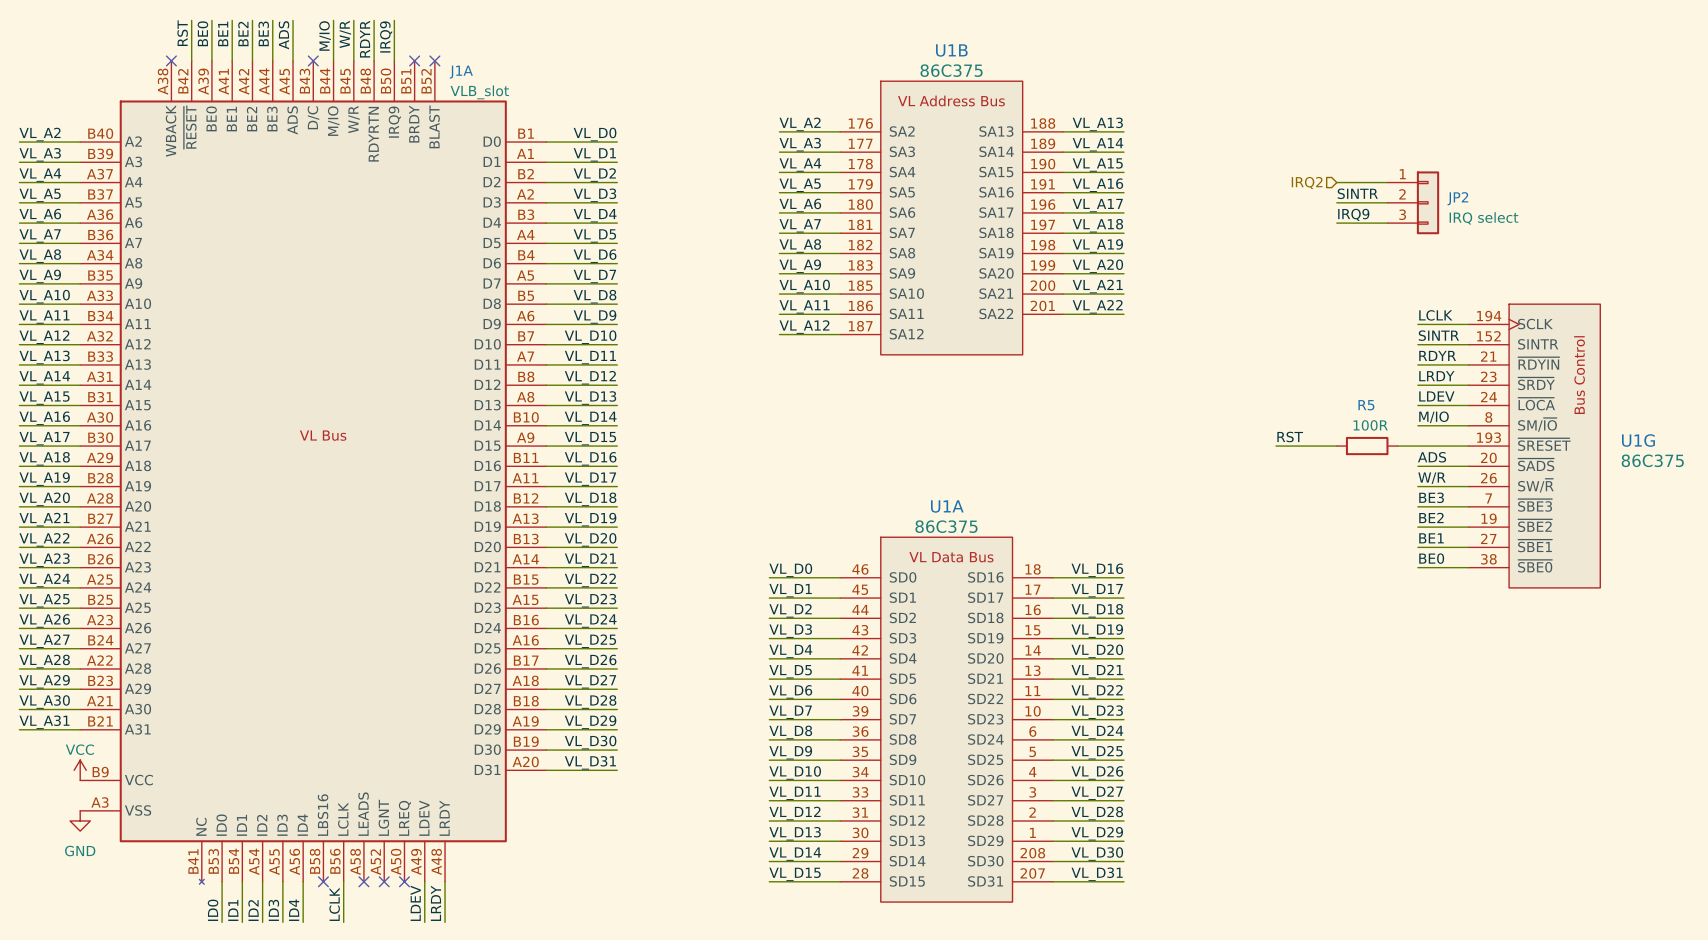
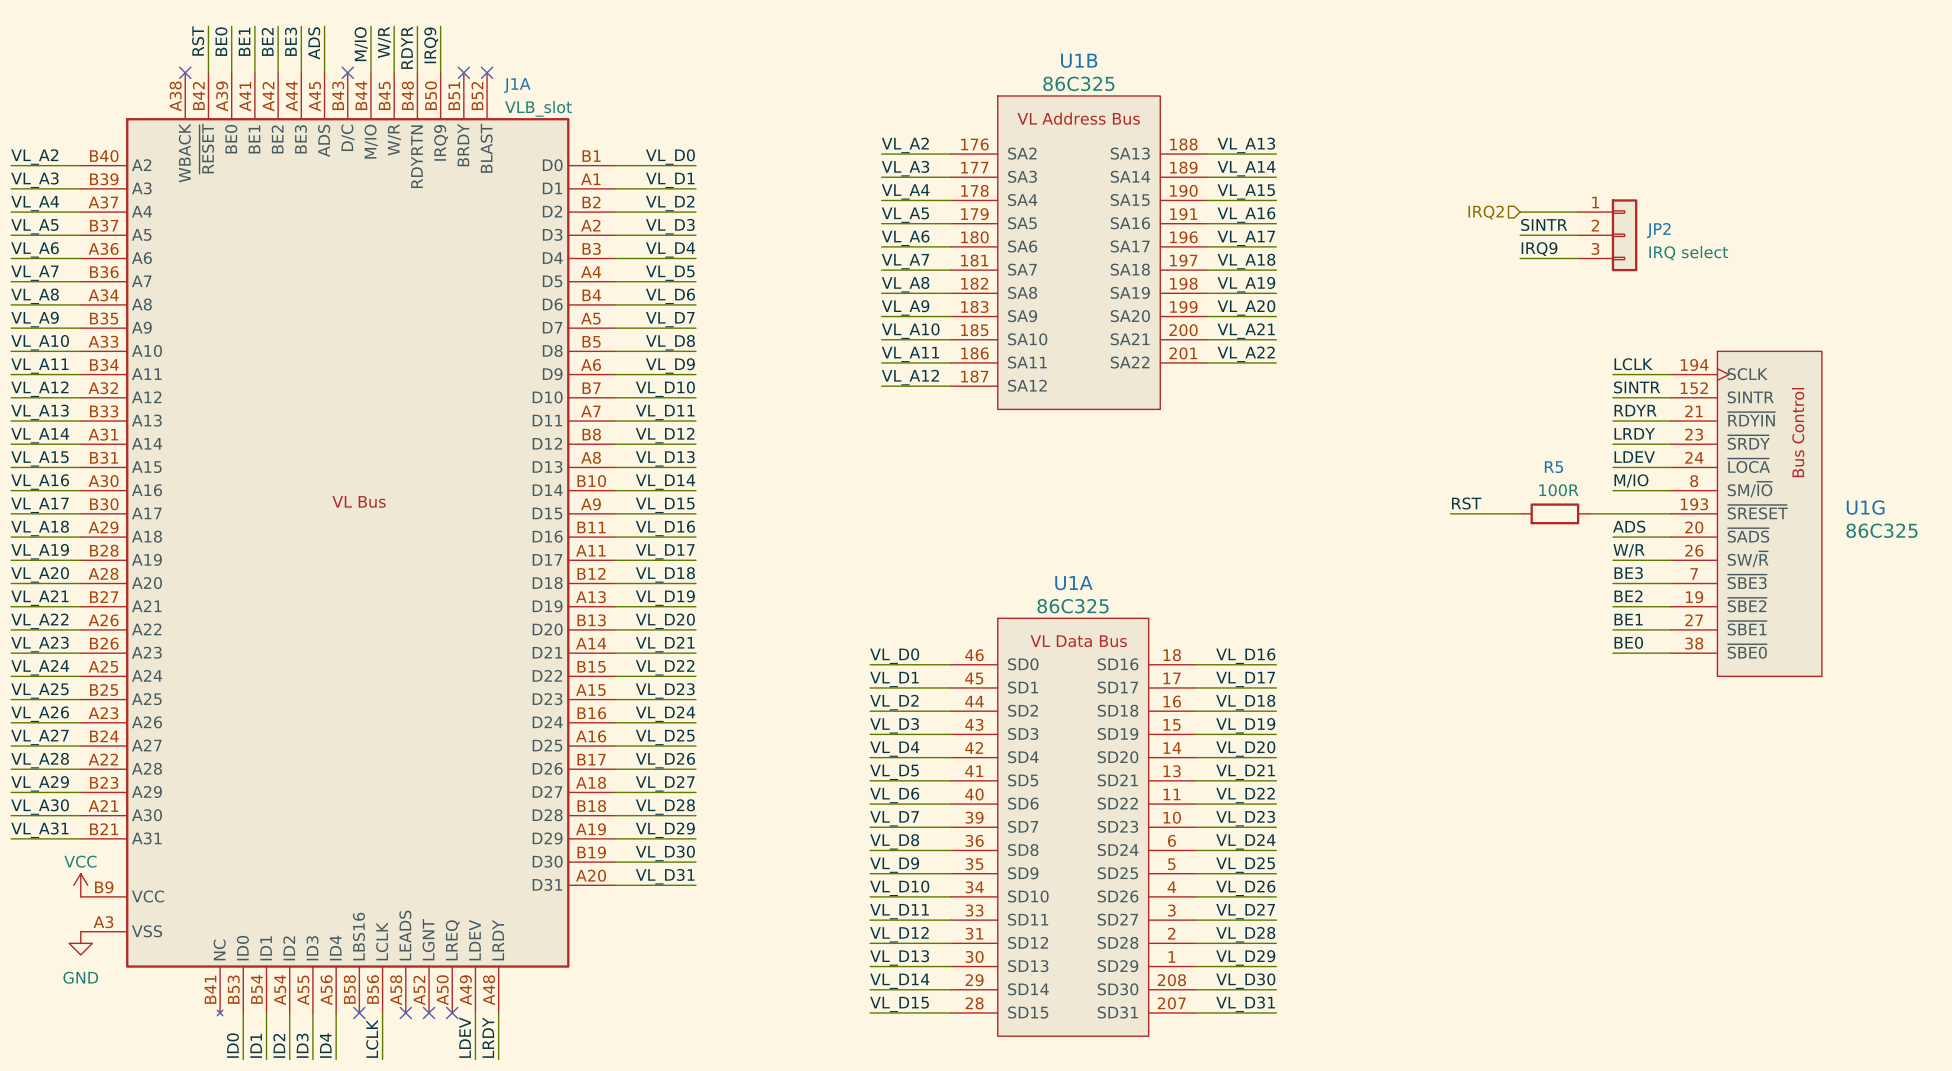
U1B value: 86C375 (951, 70) -> 86C325 (1078, 83)
U1G value: 86C375 (1652, 460) -> 86C325 (1881, 530)
U1A value: 86C375 (946, 526) -> 86C325 (1073, 606)

